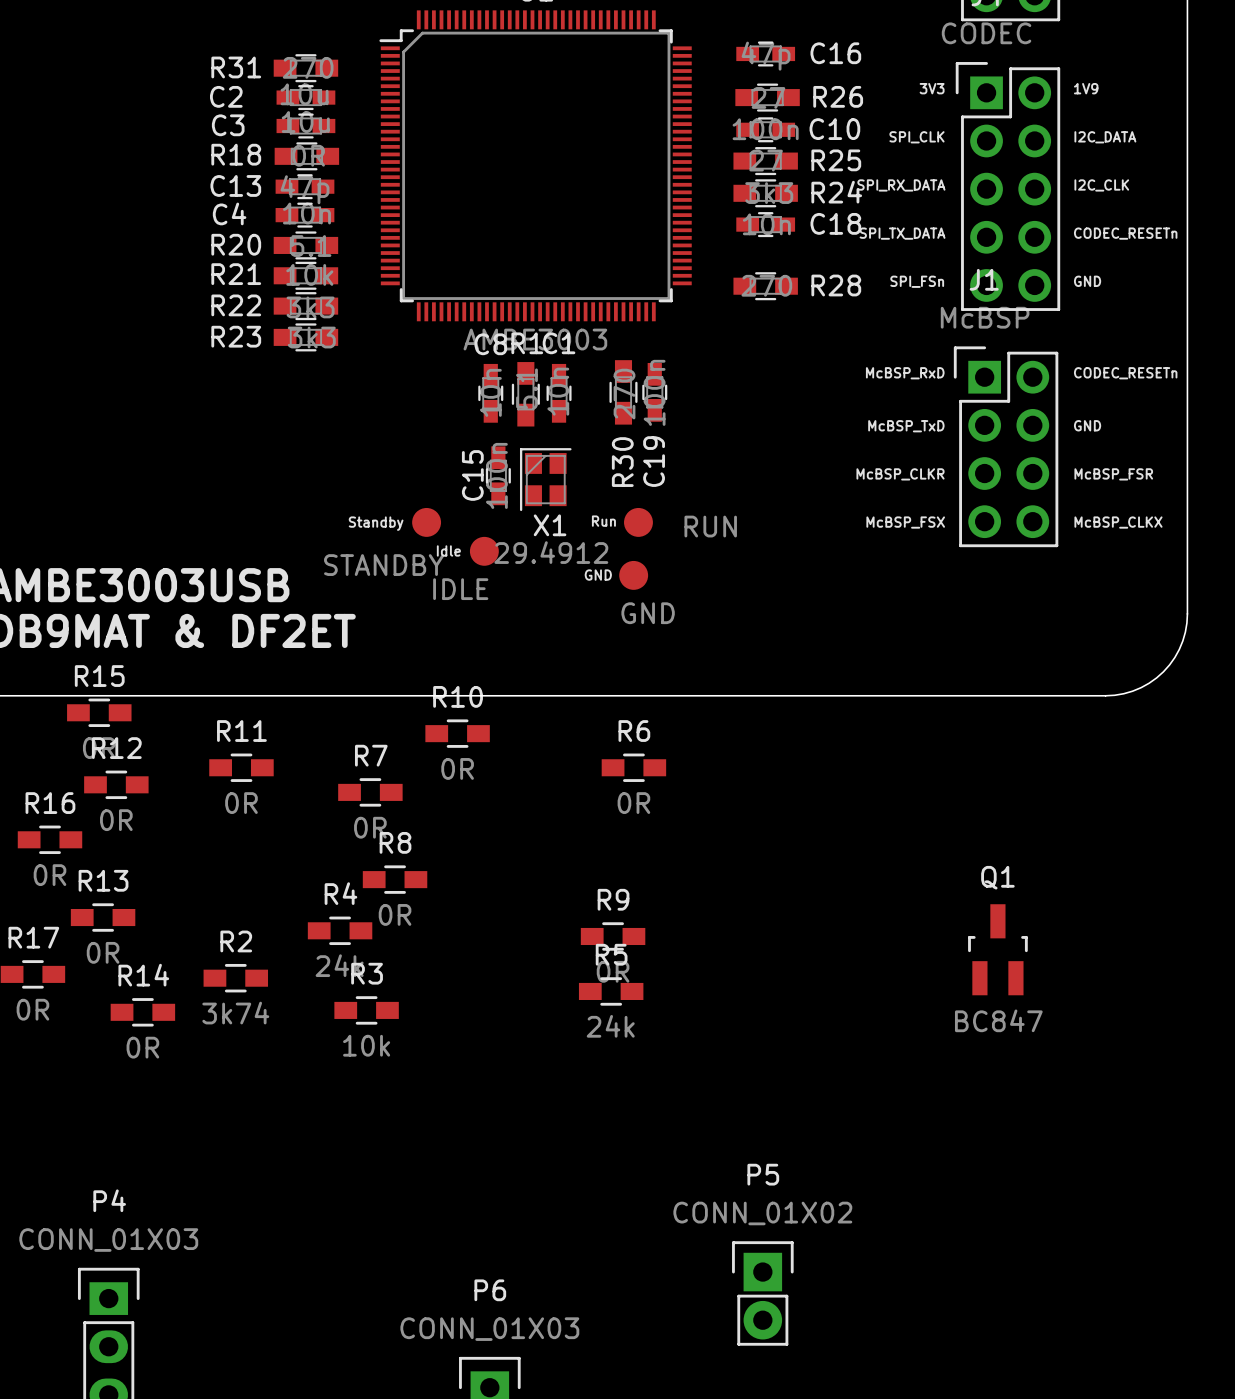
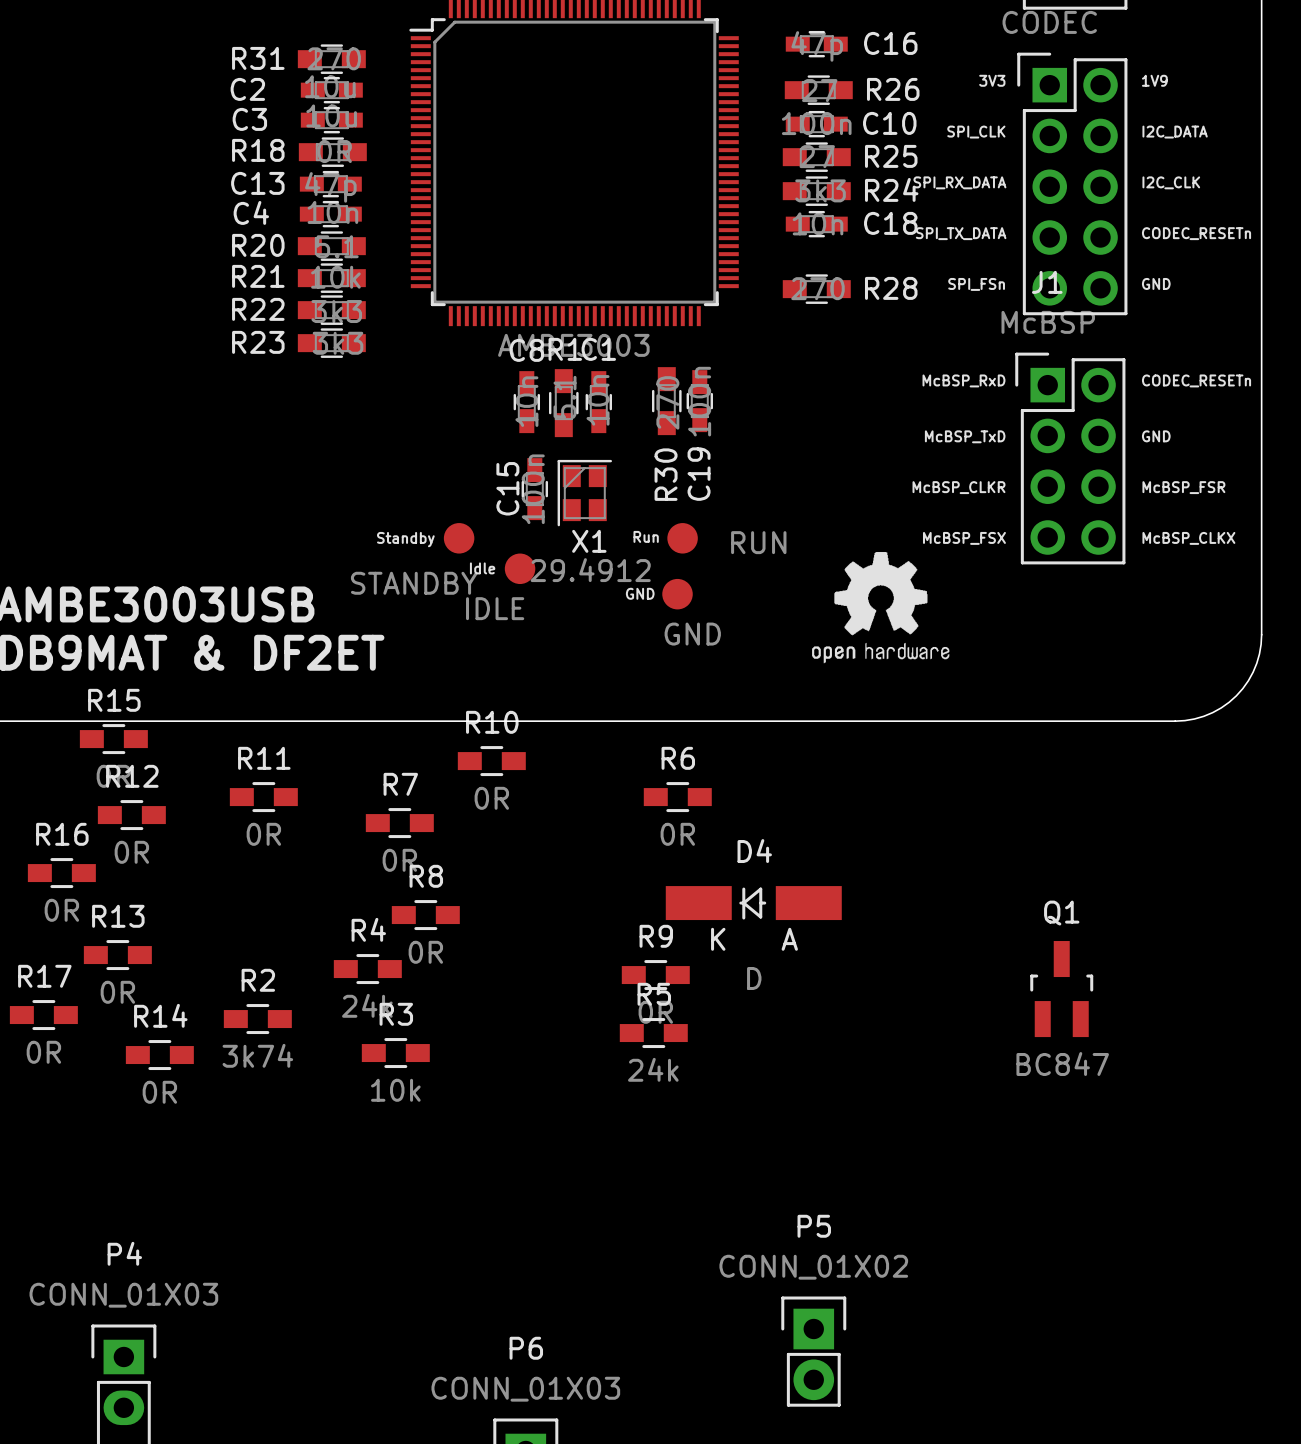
drawing: none -> [812, 551, 950, 664]
D4: none -> D (753, 903)

